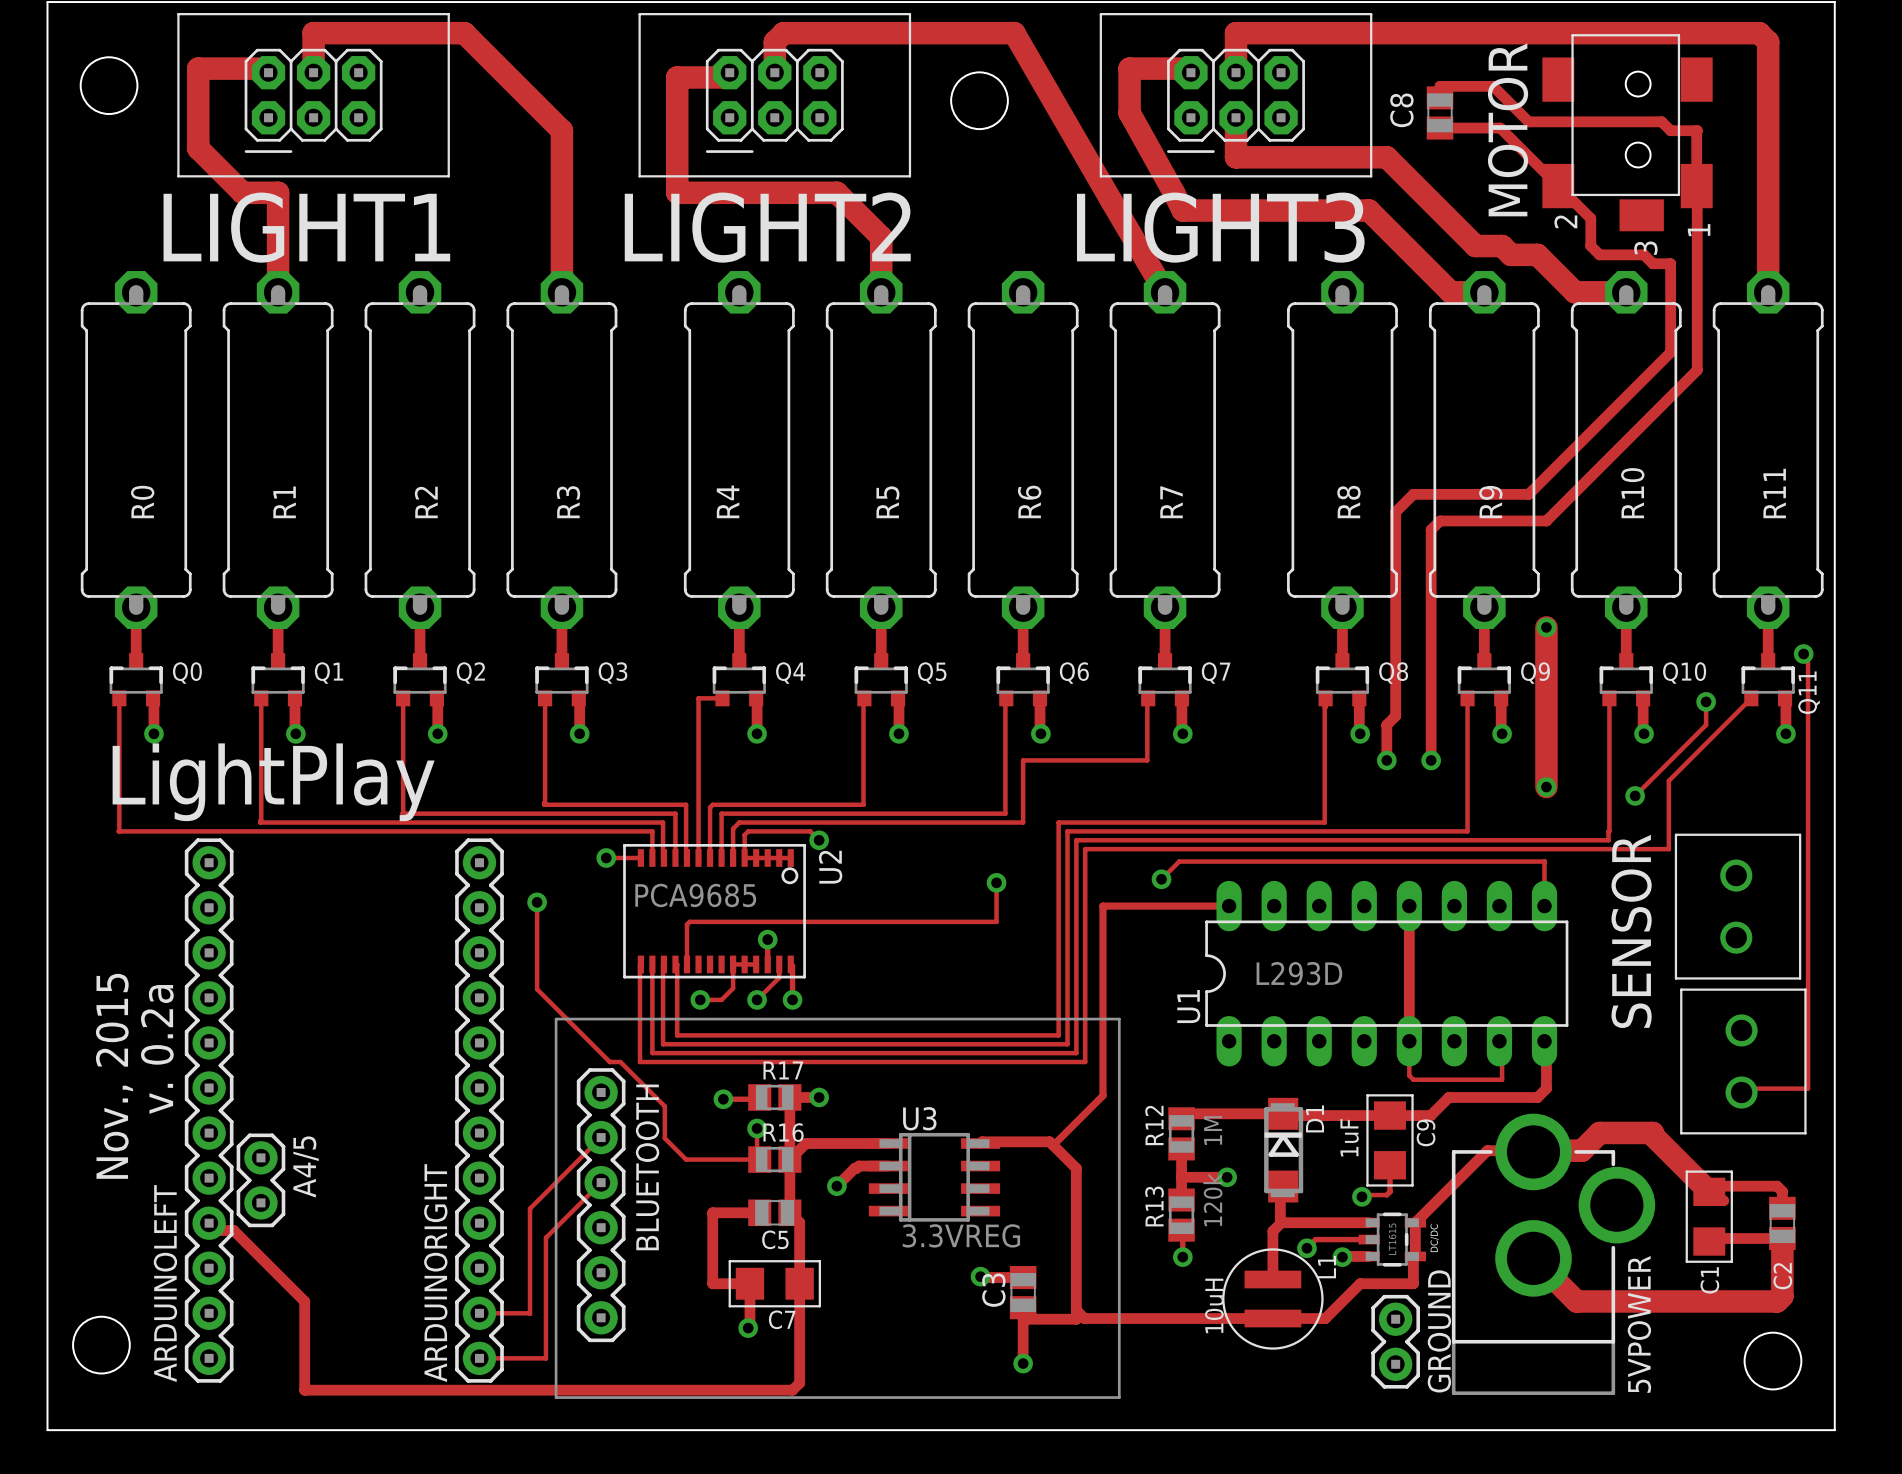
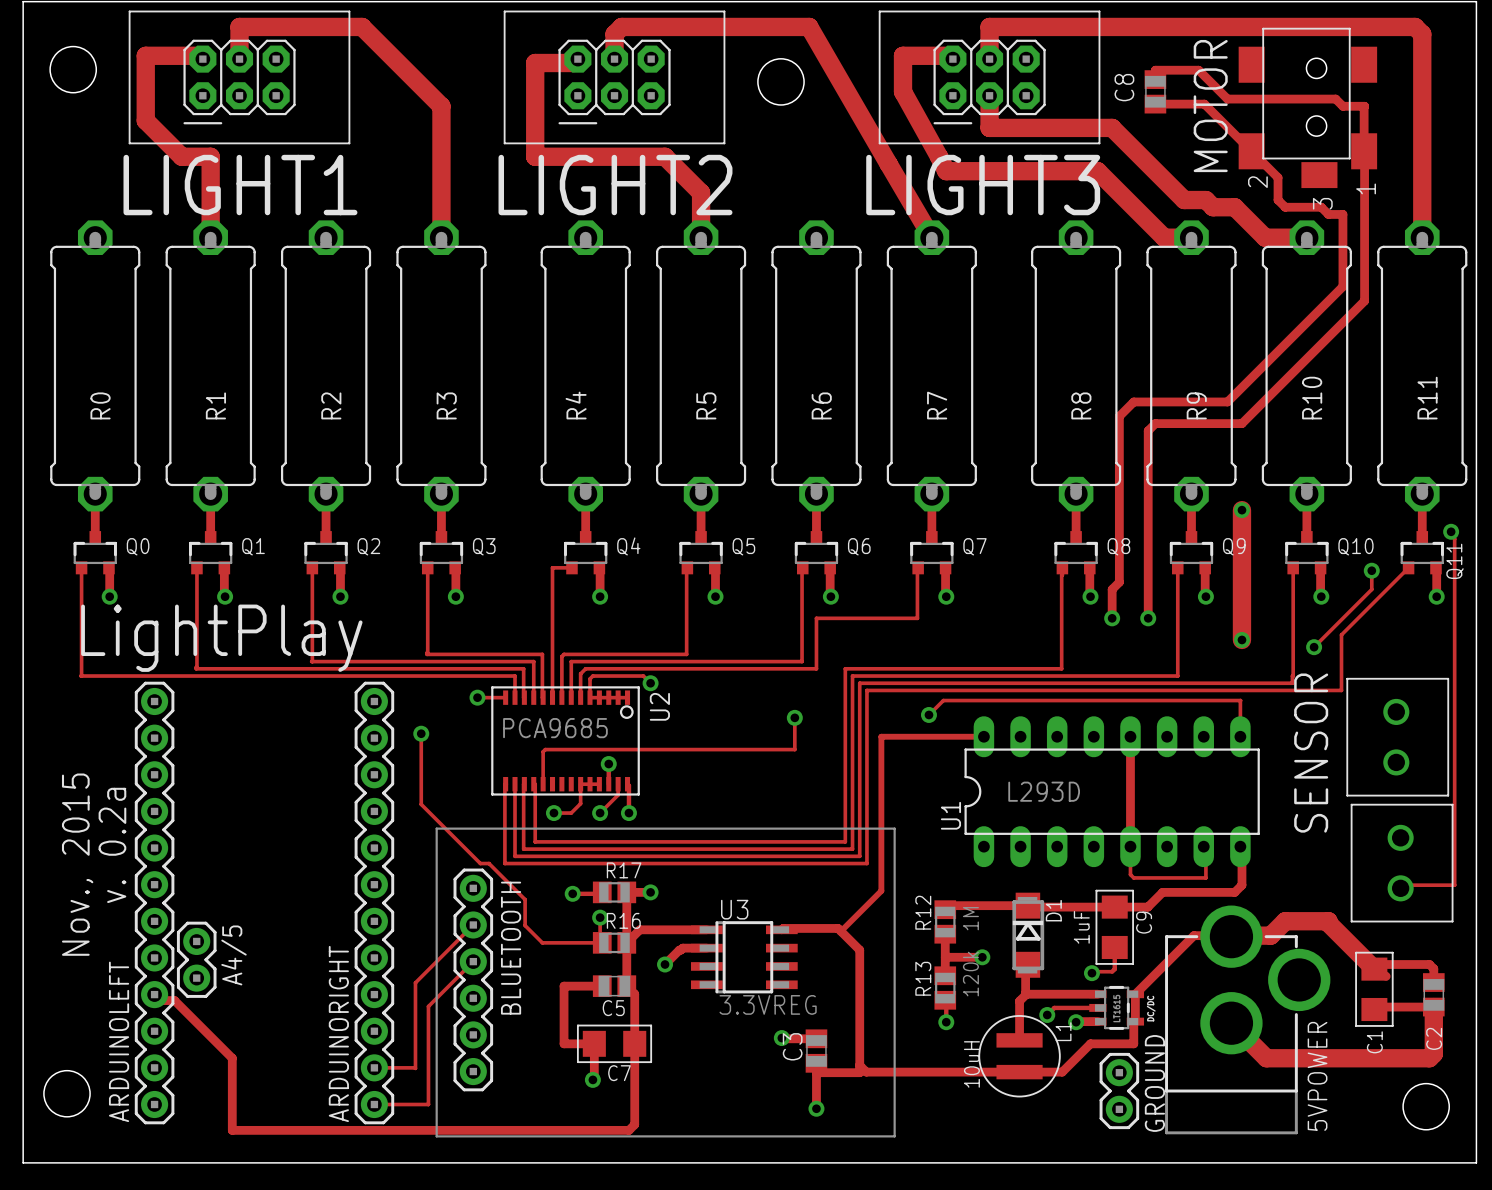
U3 footprint: [868, 1132, 1001, 1222] -> [690, 921, 798, 994]

